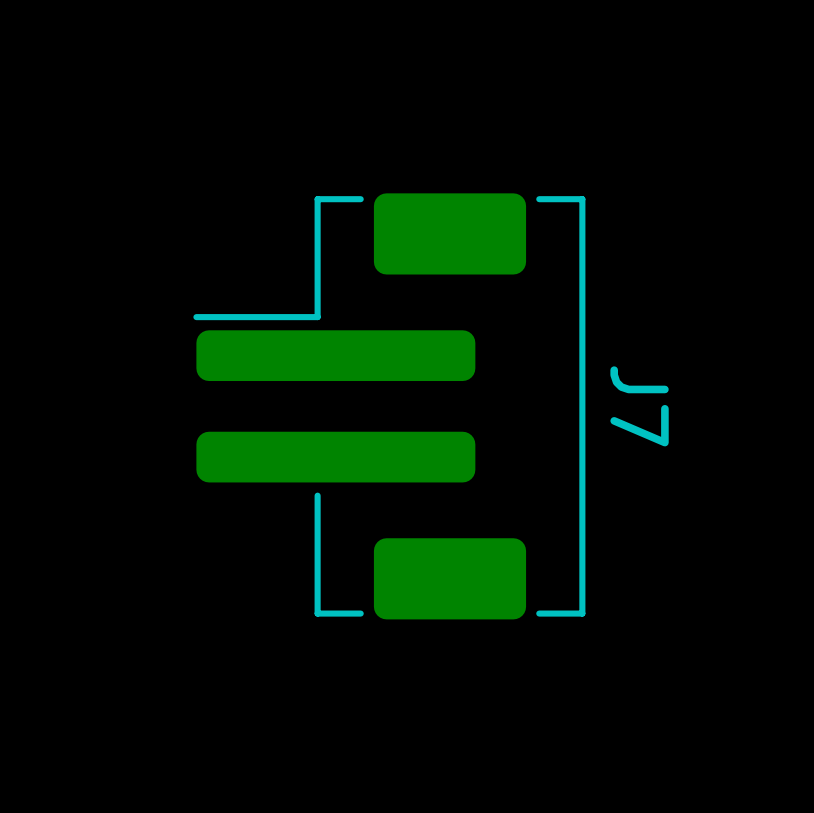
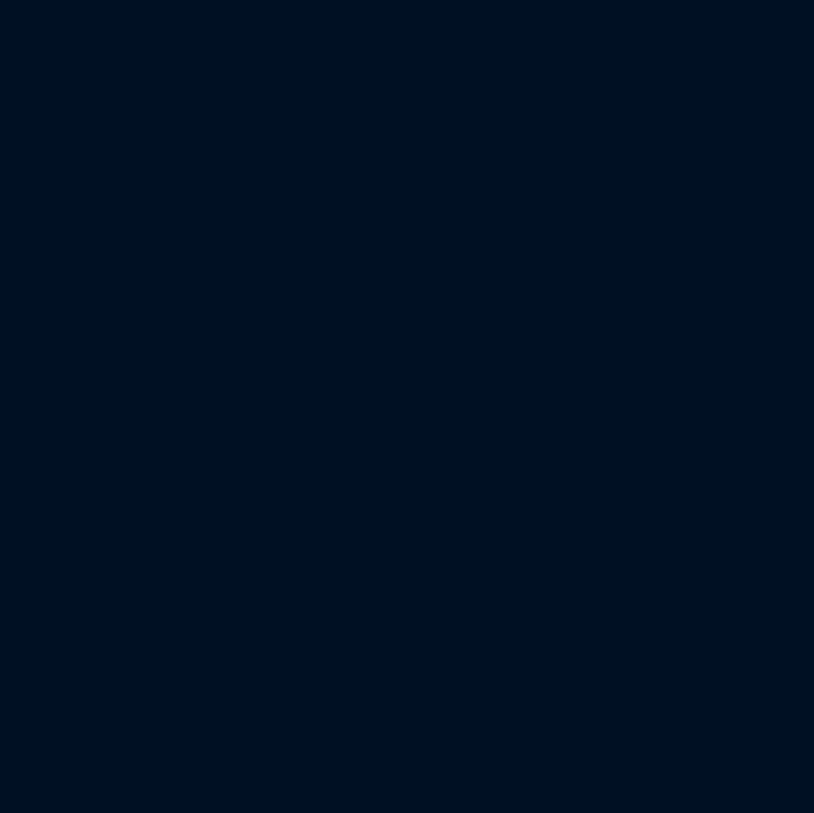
J7: (389, 406) -> none

